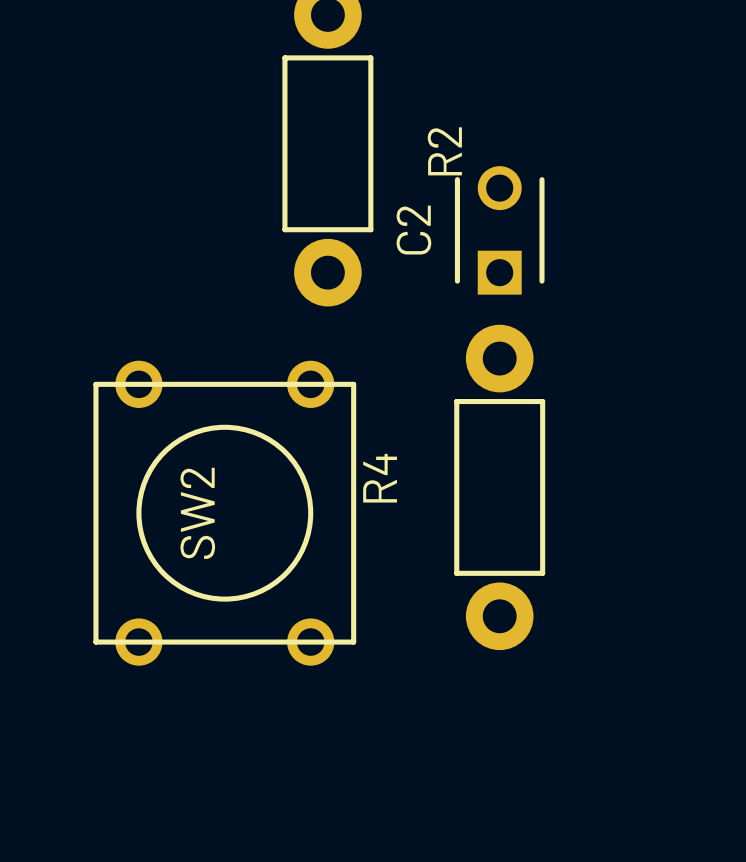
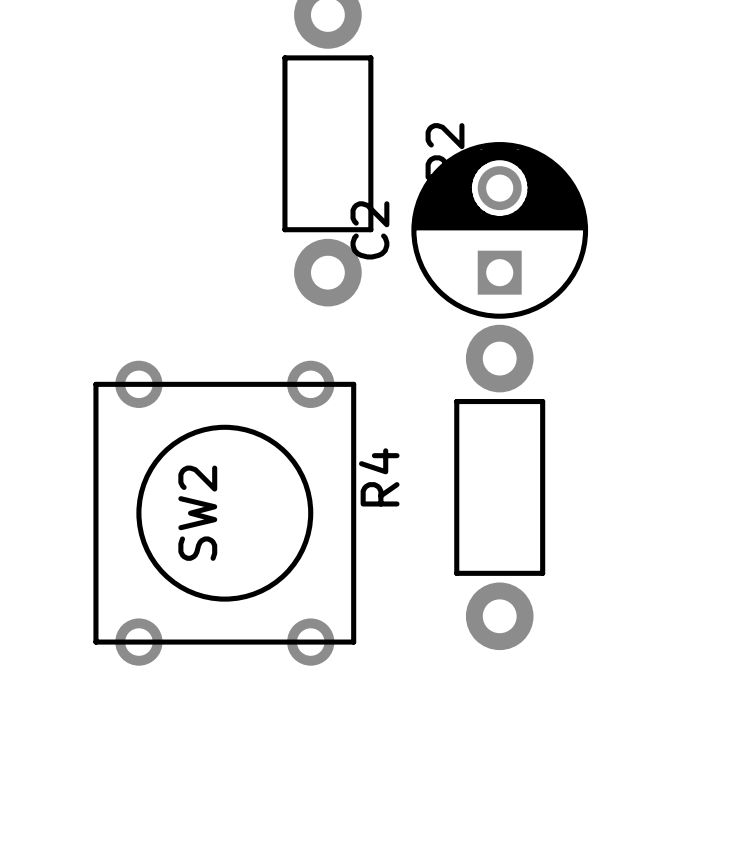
C2 footprint: [454, 166, 545, 295] -> [411, 142, 589, 319]

